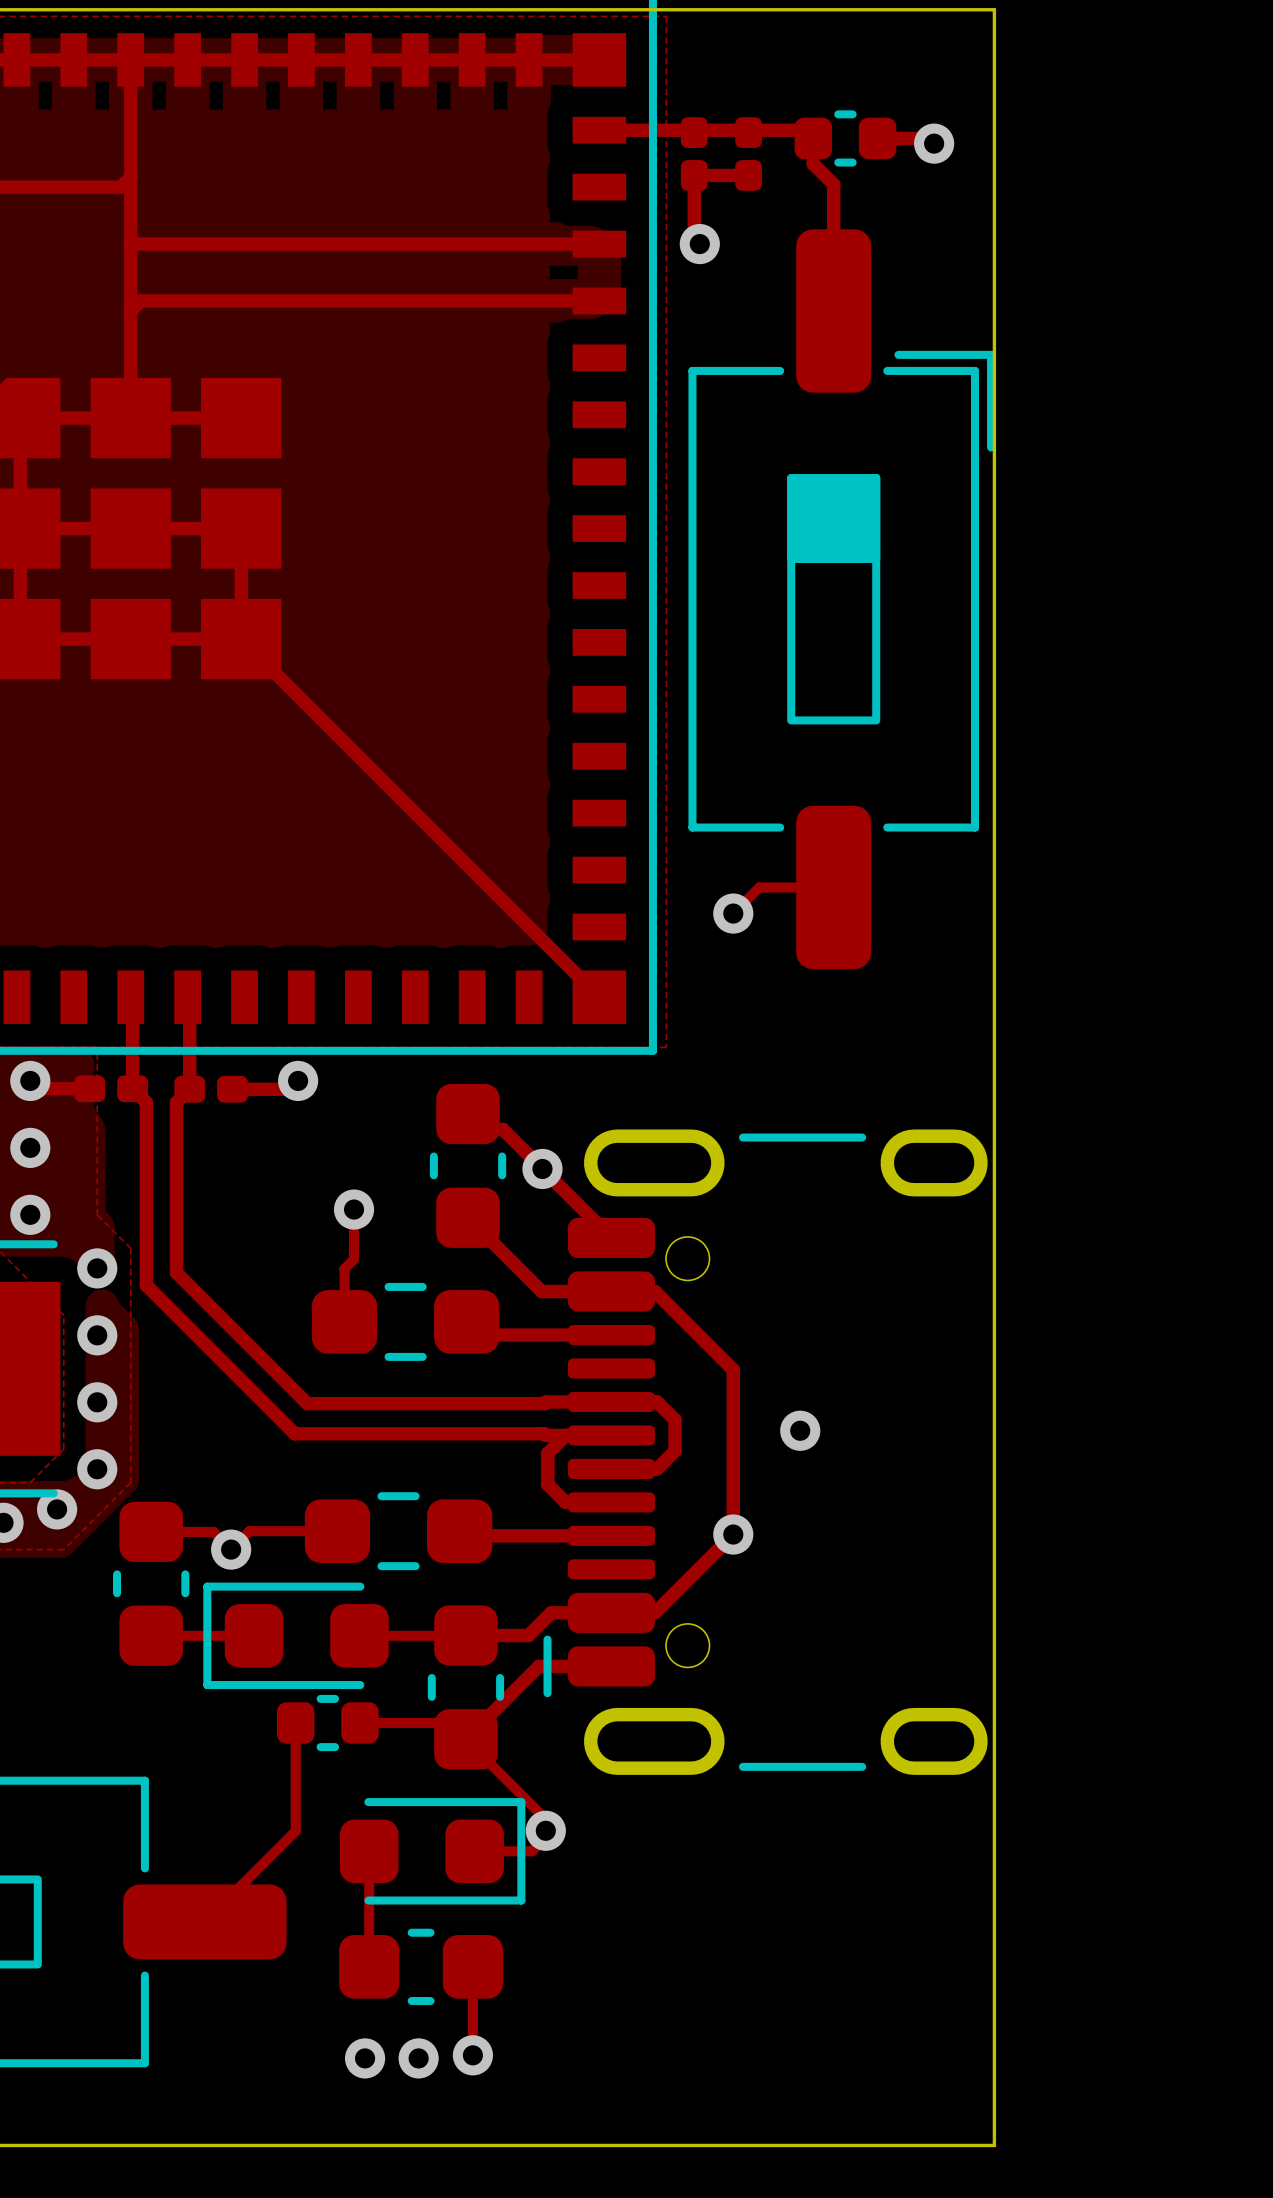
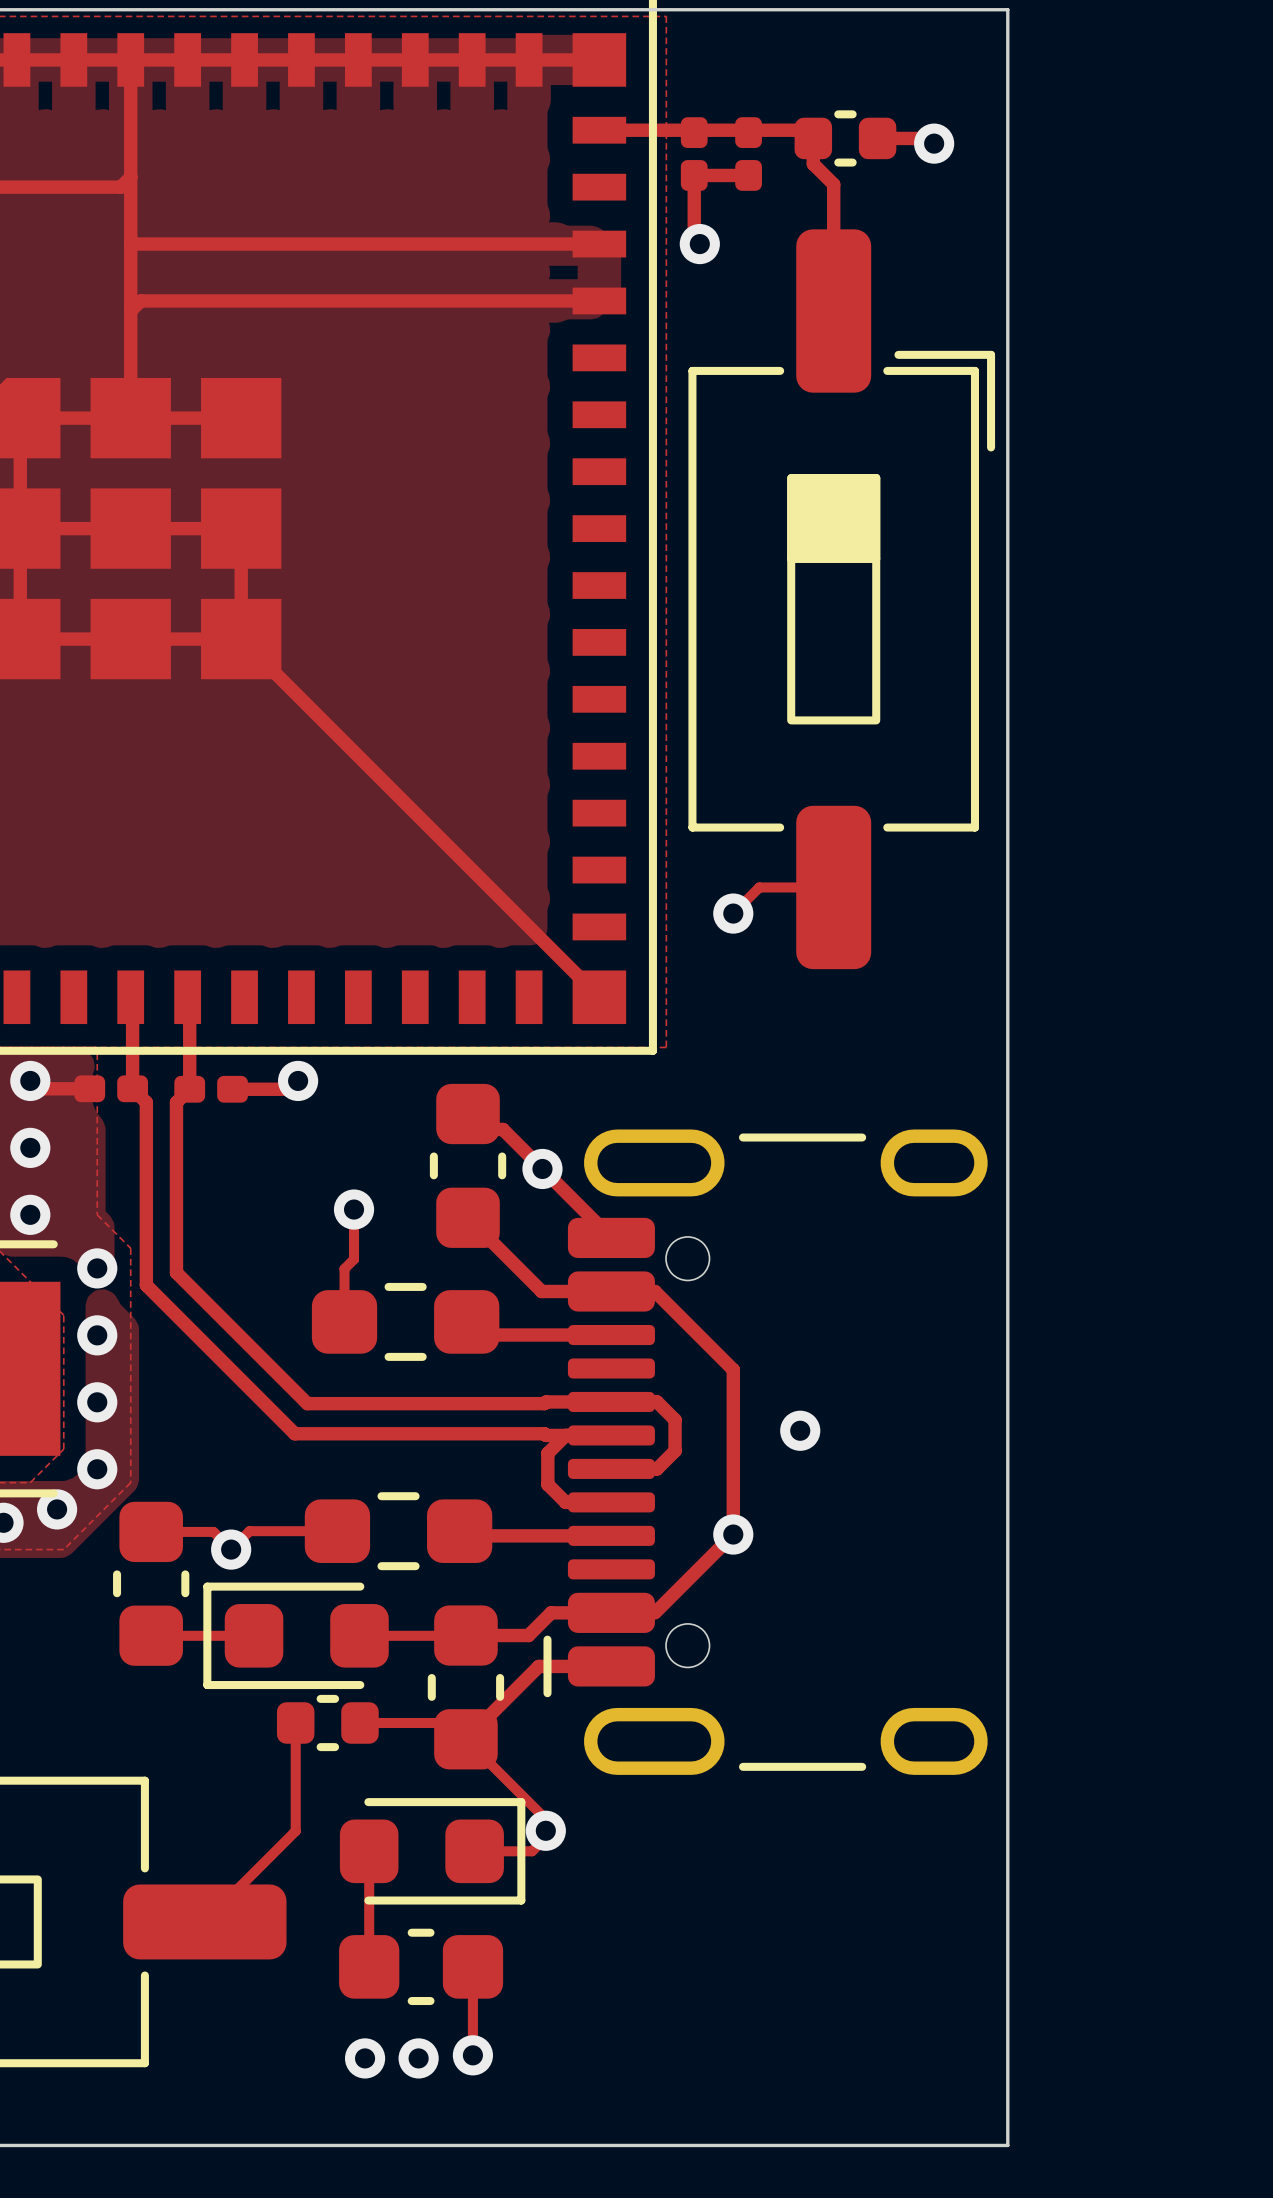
board edge: (994, 9) (994, 2145) -> (994, 9) (1007, 9) (1007, 2145) (994, 2145)

